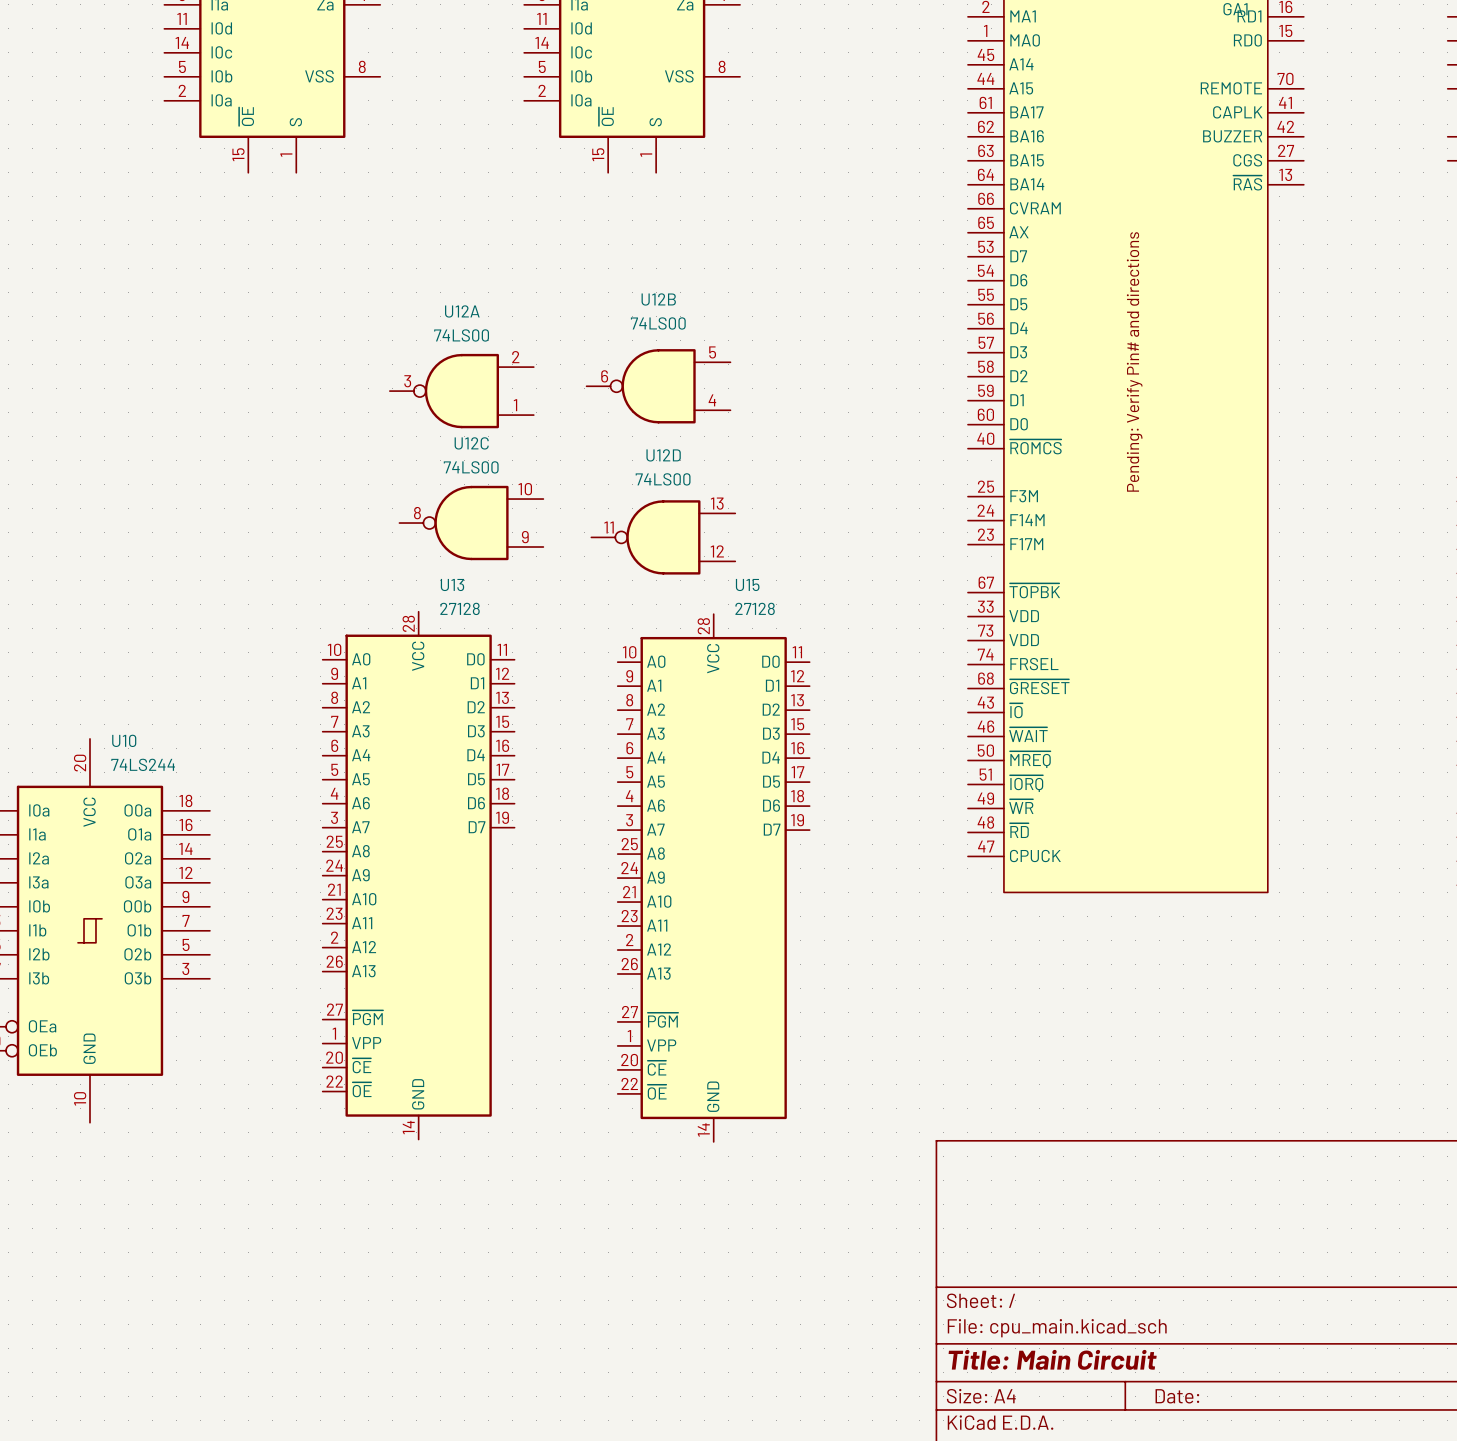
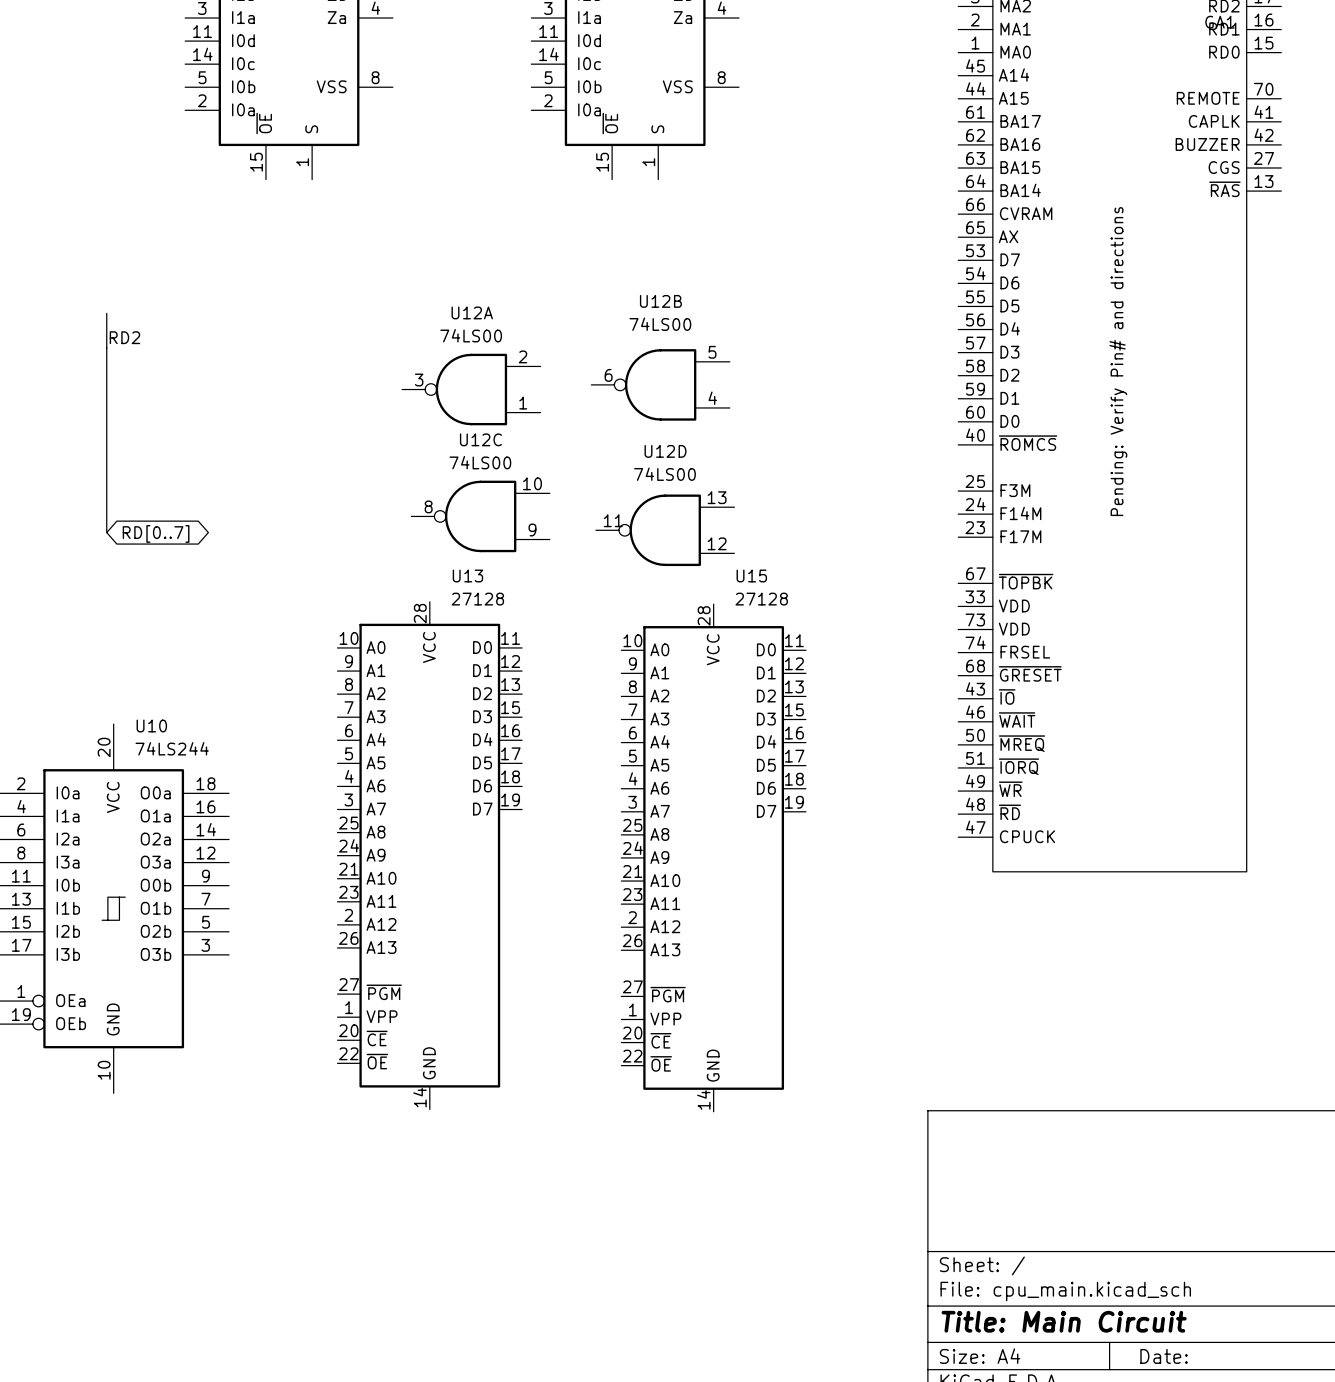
bus: none -> (106, 313) (106, 532)
label: none -> RD2 (124, 337)
global label: none -> RD[0..7] (156, 533)

